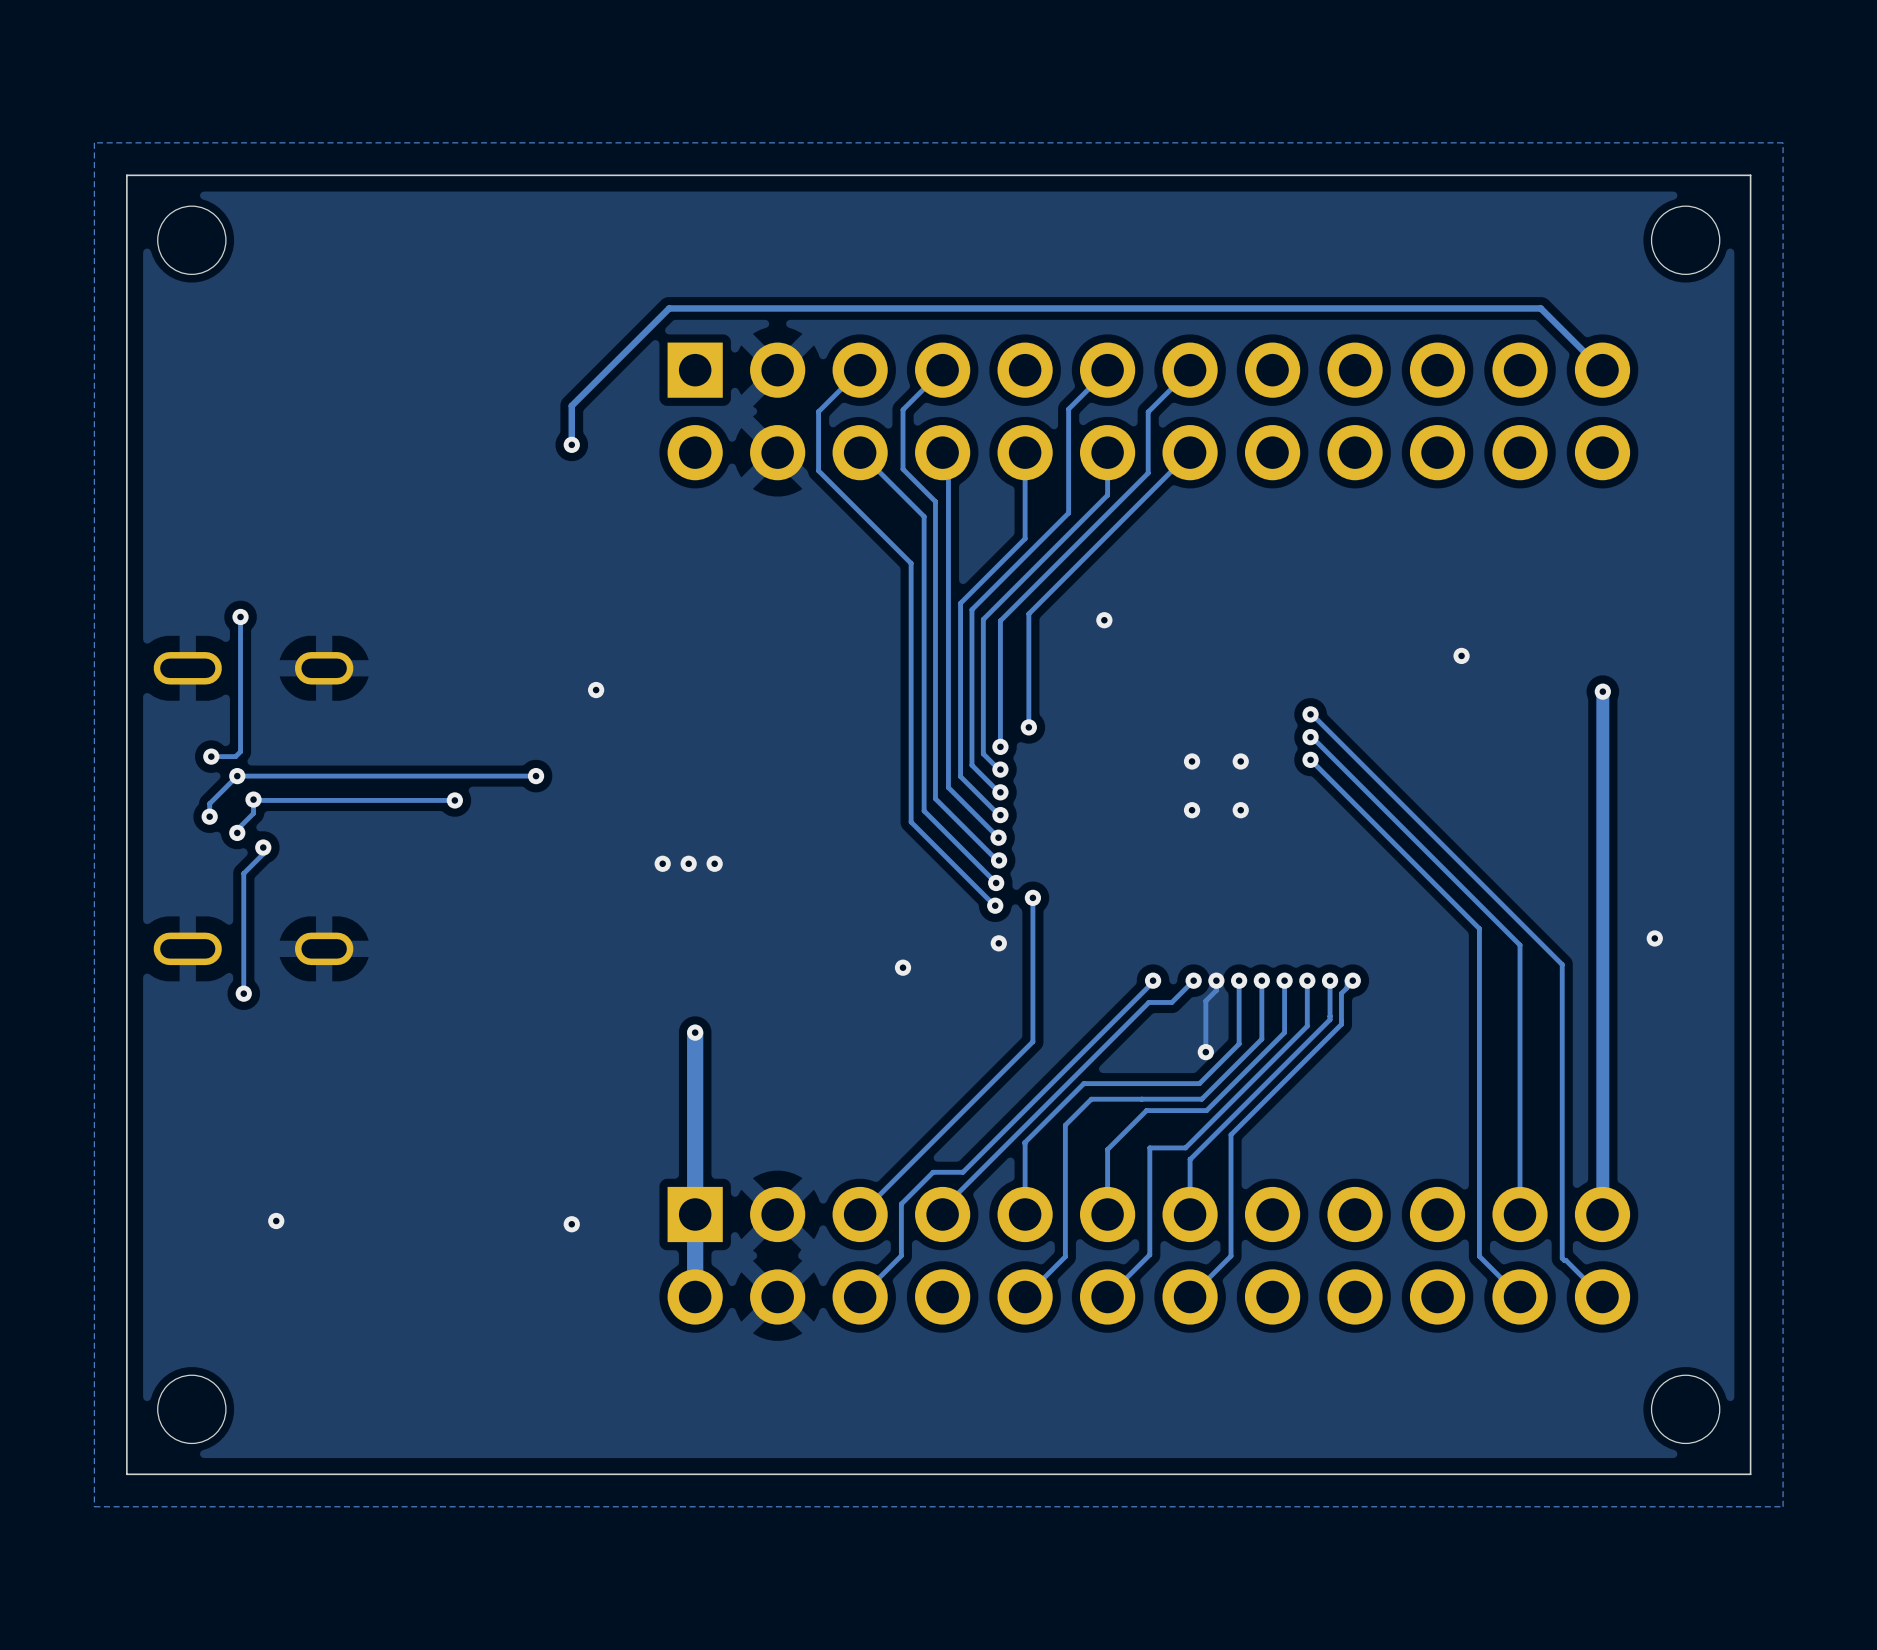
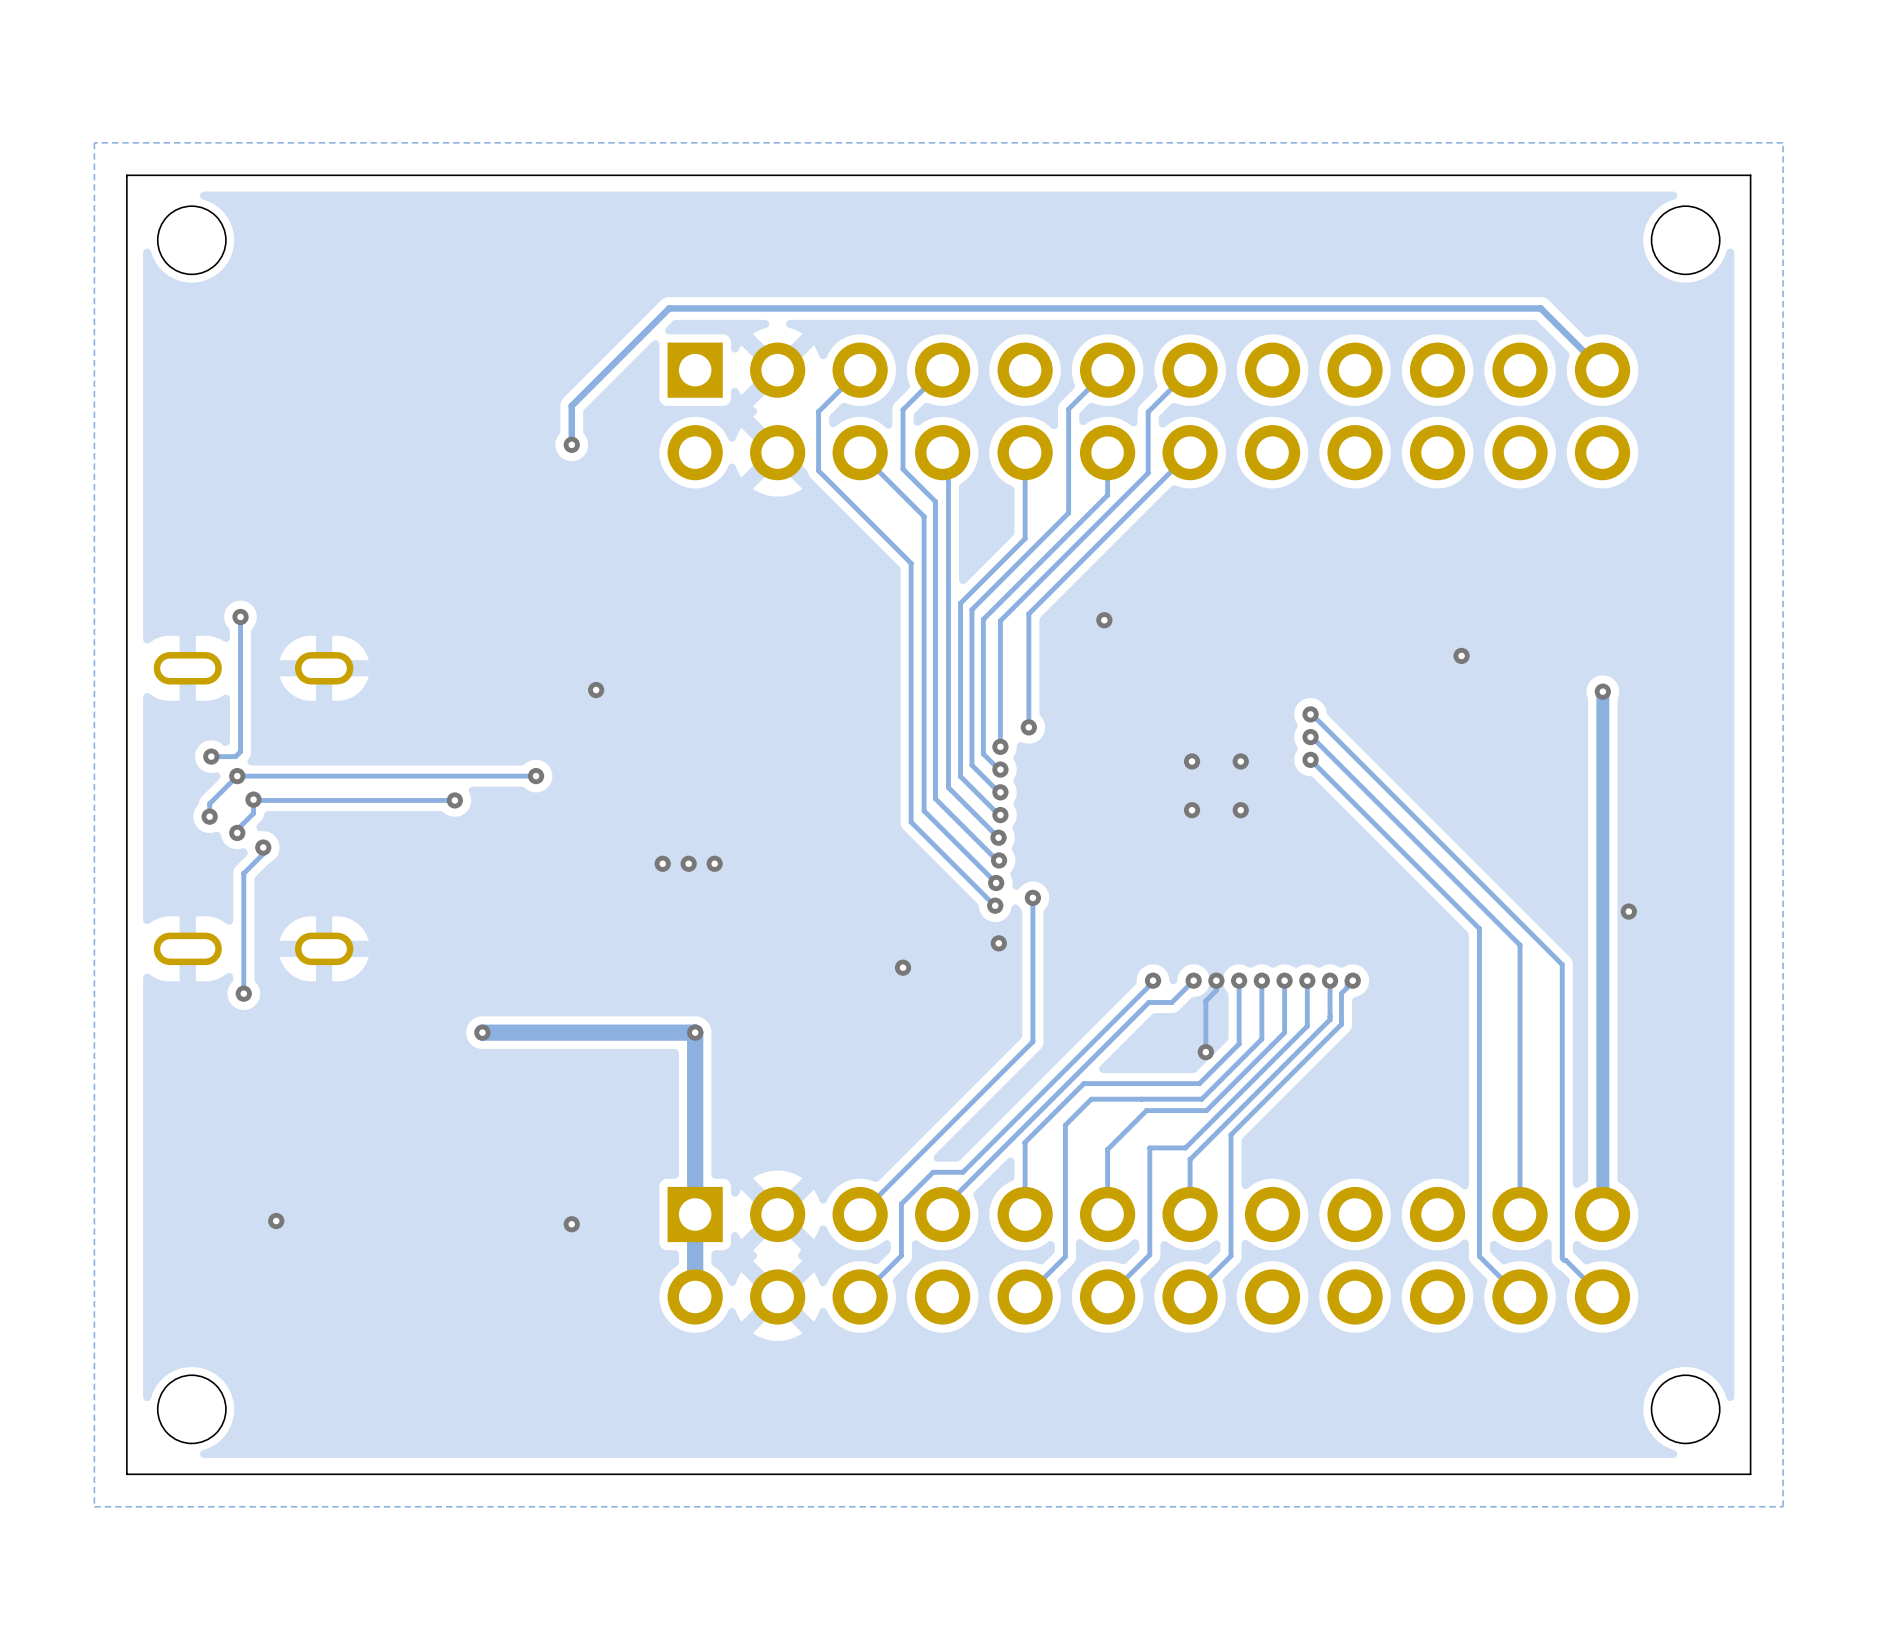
via position: (1654, 938) -> (1628, 911)
track: none -> (482, 1032) (695, 1032) (693, 1034)
via: none -> (482, 1032)

